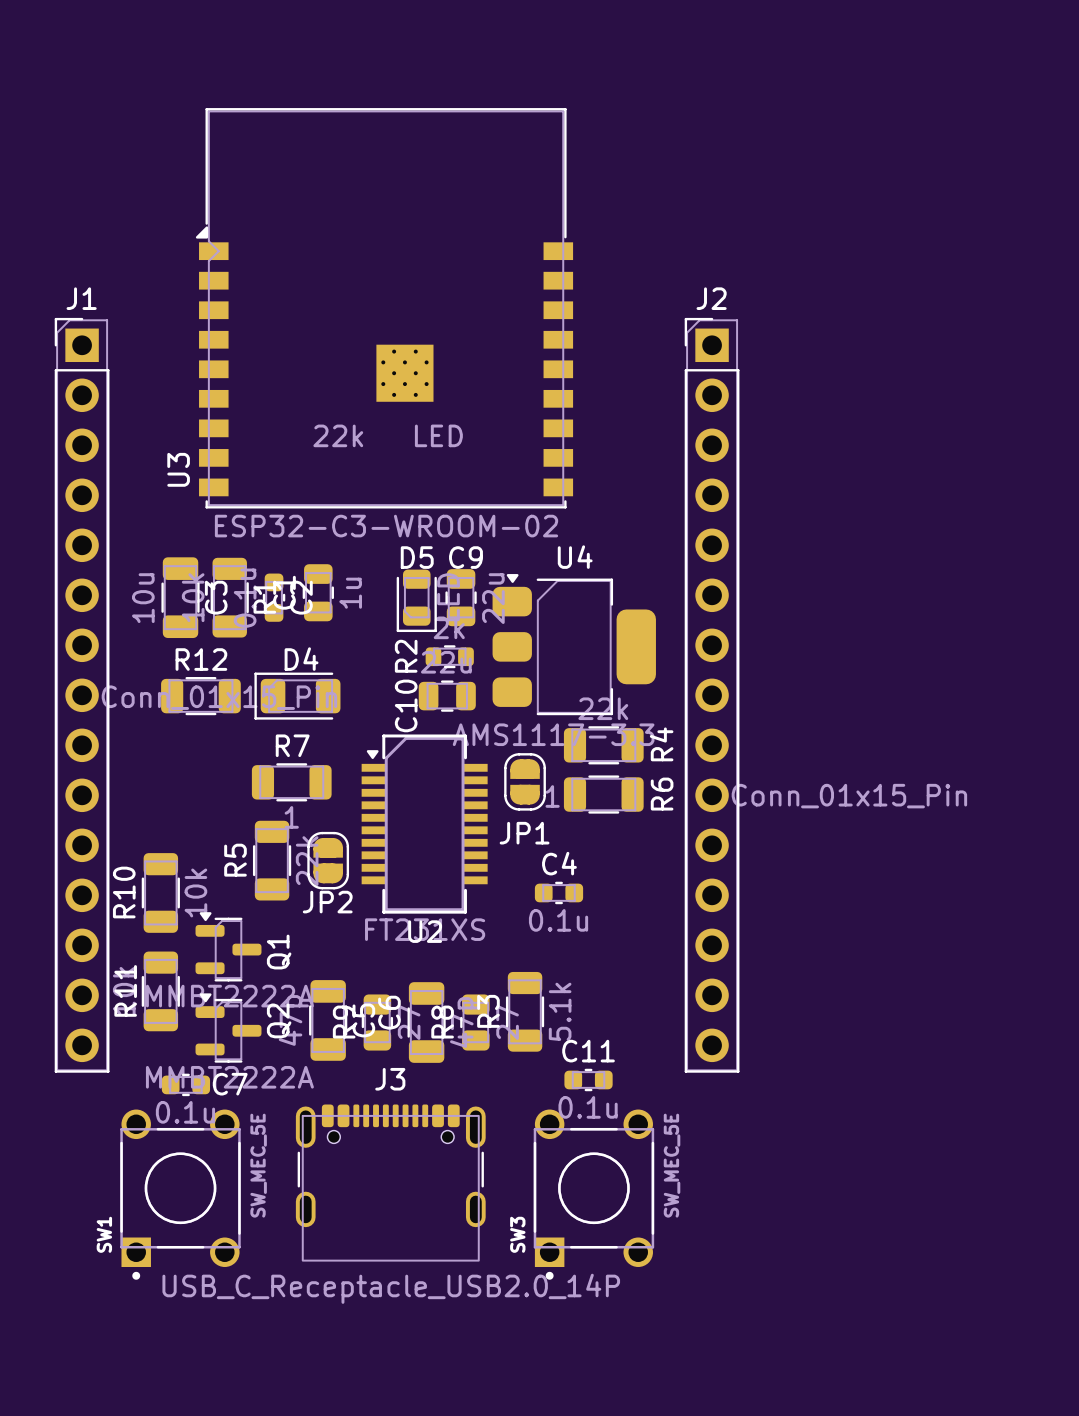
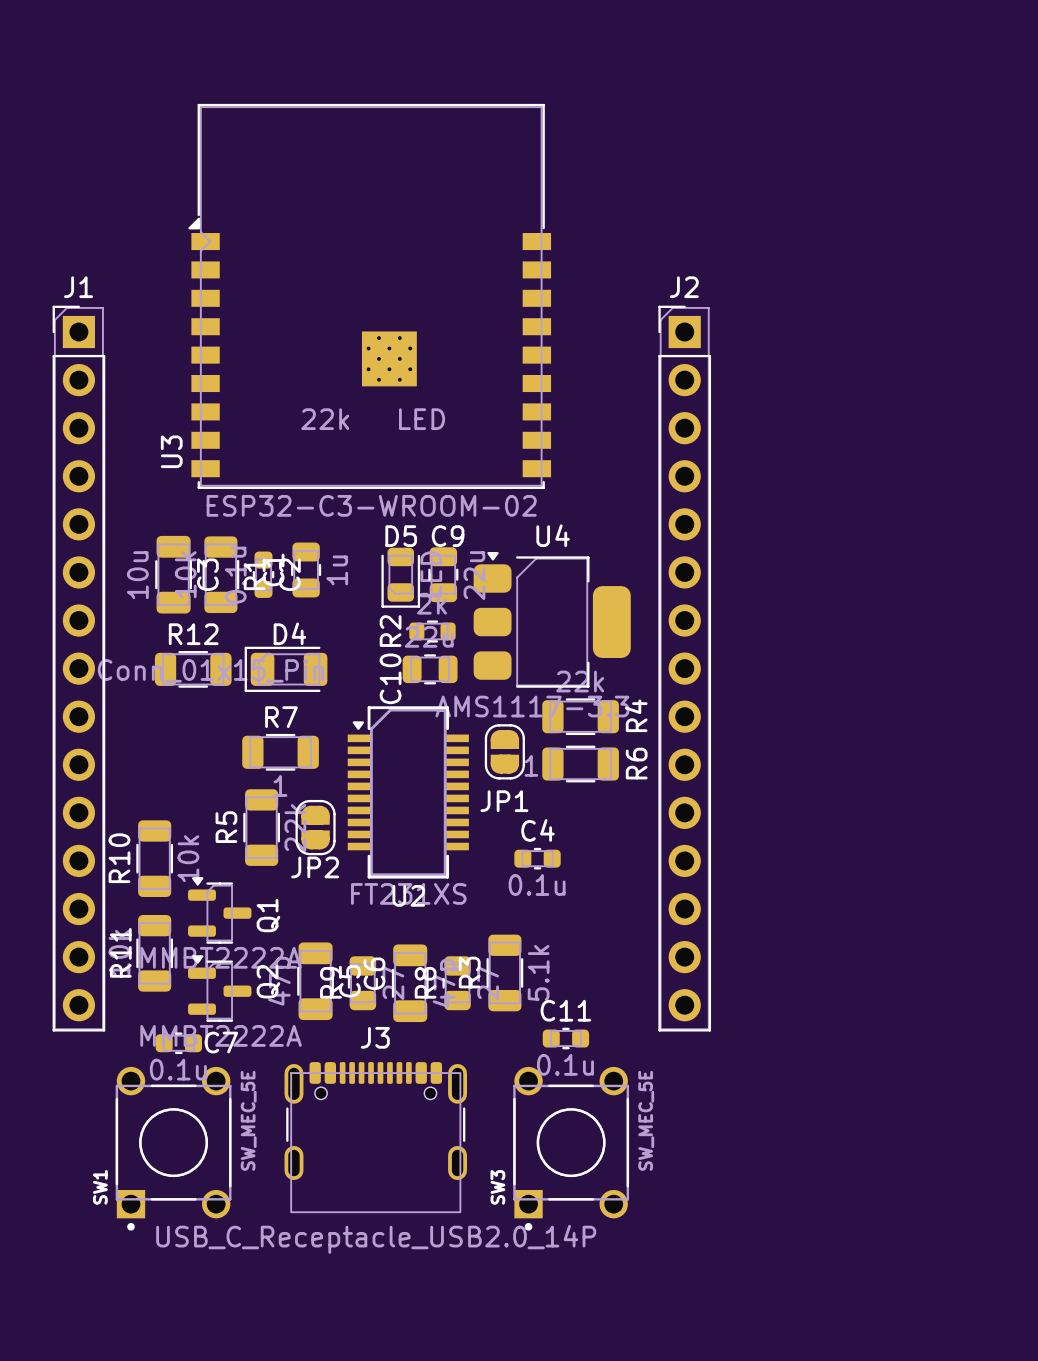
J2 value: Conn_01x15_Pin (849, 796) -> none

